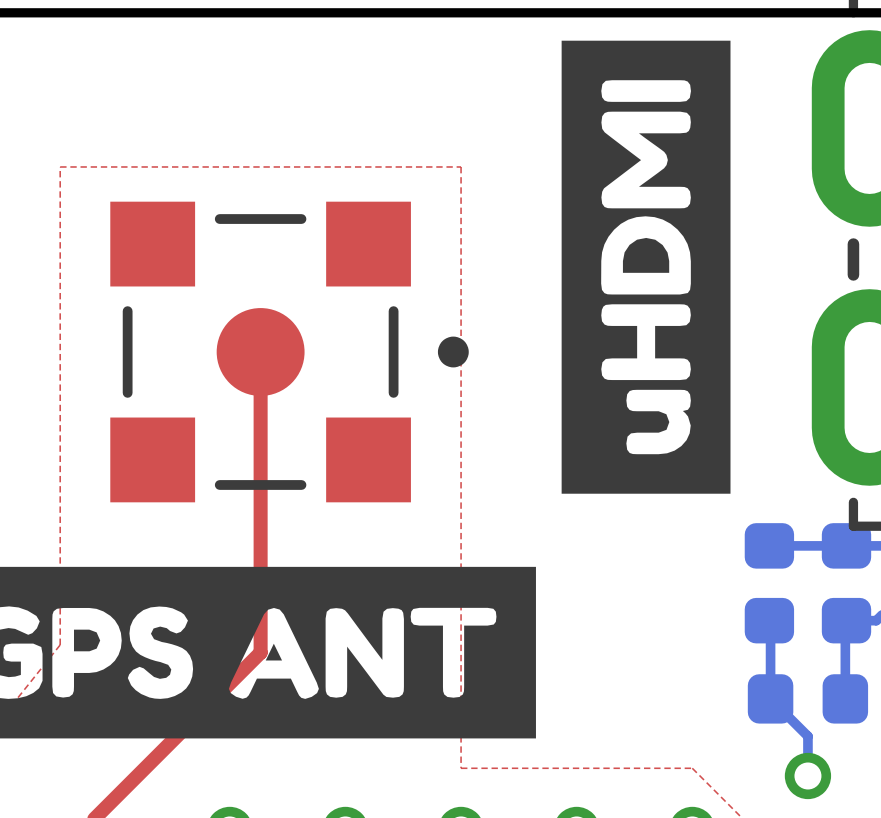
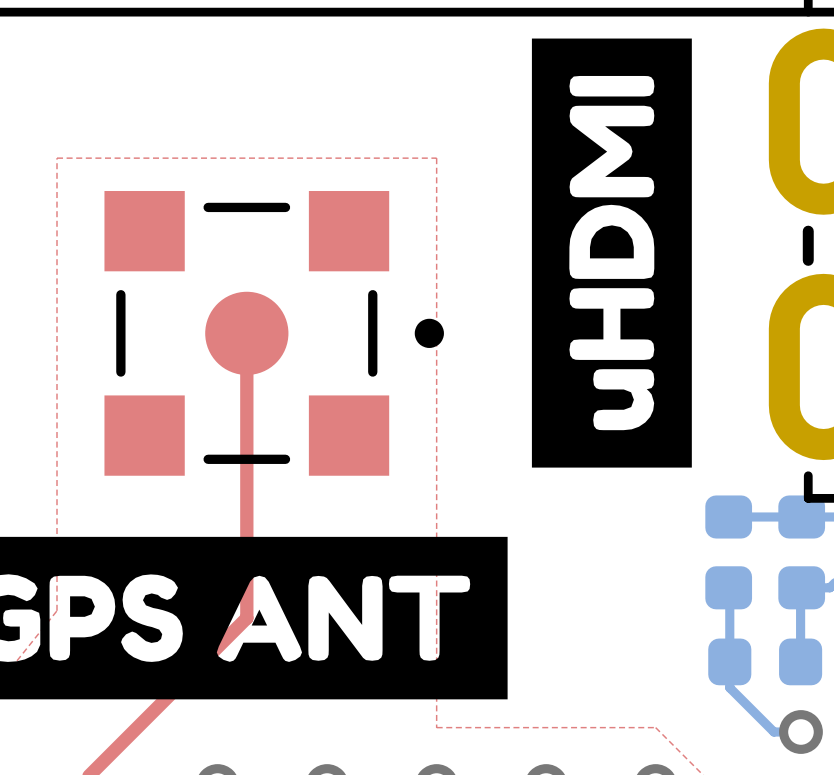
bottom track: (770, 698) (807, 736) (807, 775) -> (729, 661) (729, 687) (773, 732) (800, 732)
via position: (807, 775) -> (800, 732)

